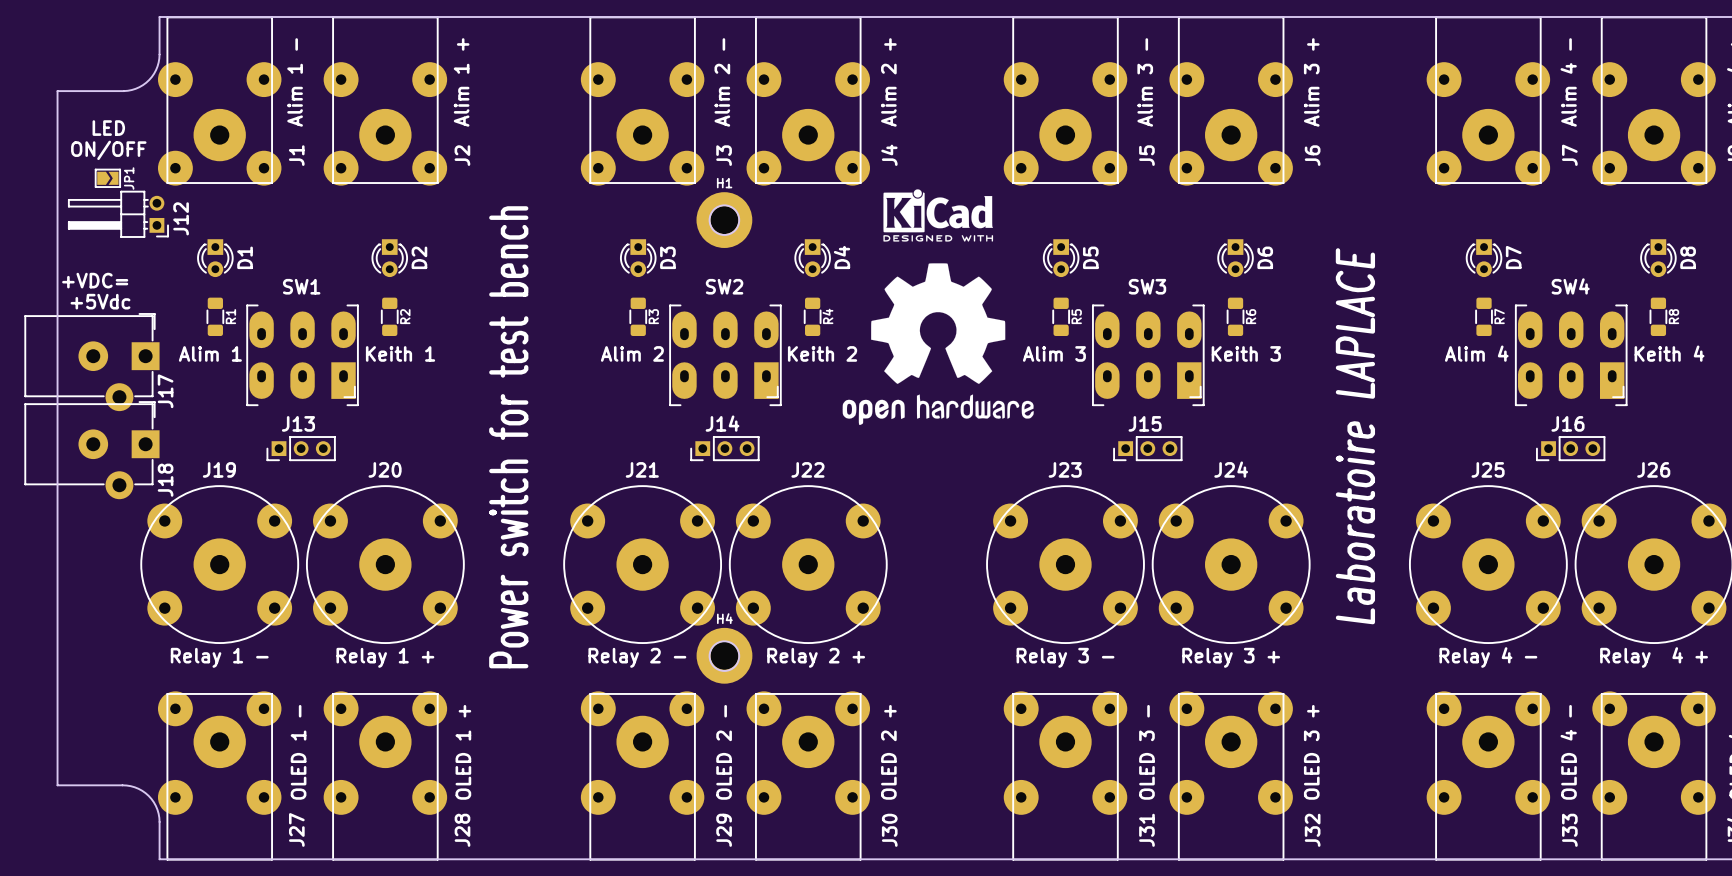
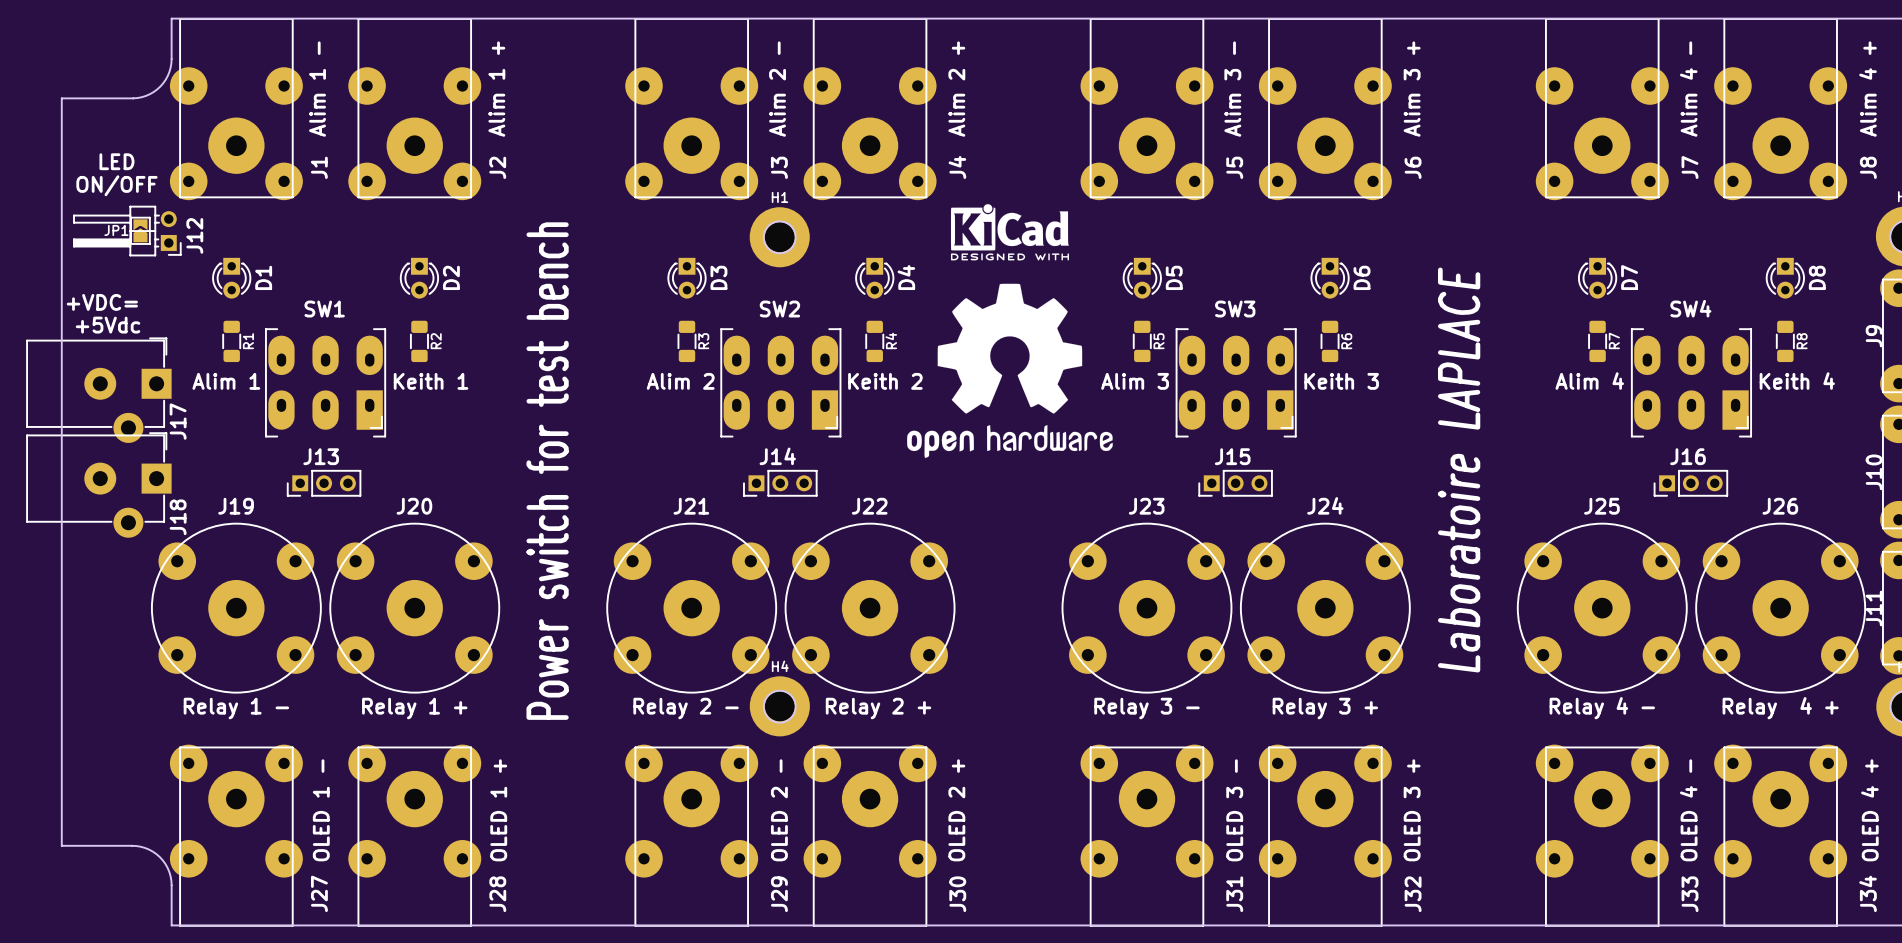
text: LED (108, 128) -> none
text: ON/OFF (108, 150) -> LED (116, 161)
text: none -> ON/OFF (116, 185)
JP1 rotation: 0° (107, 178) -> 90° counterclockwise (140, 230)
JP1 position: (107, 178) -> (140, 230)
JP1 name position: JP1 (129, 178) -> JP1 (116, 230)

